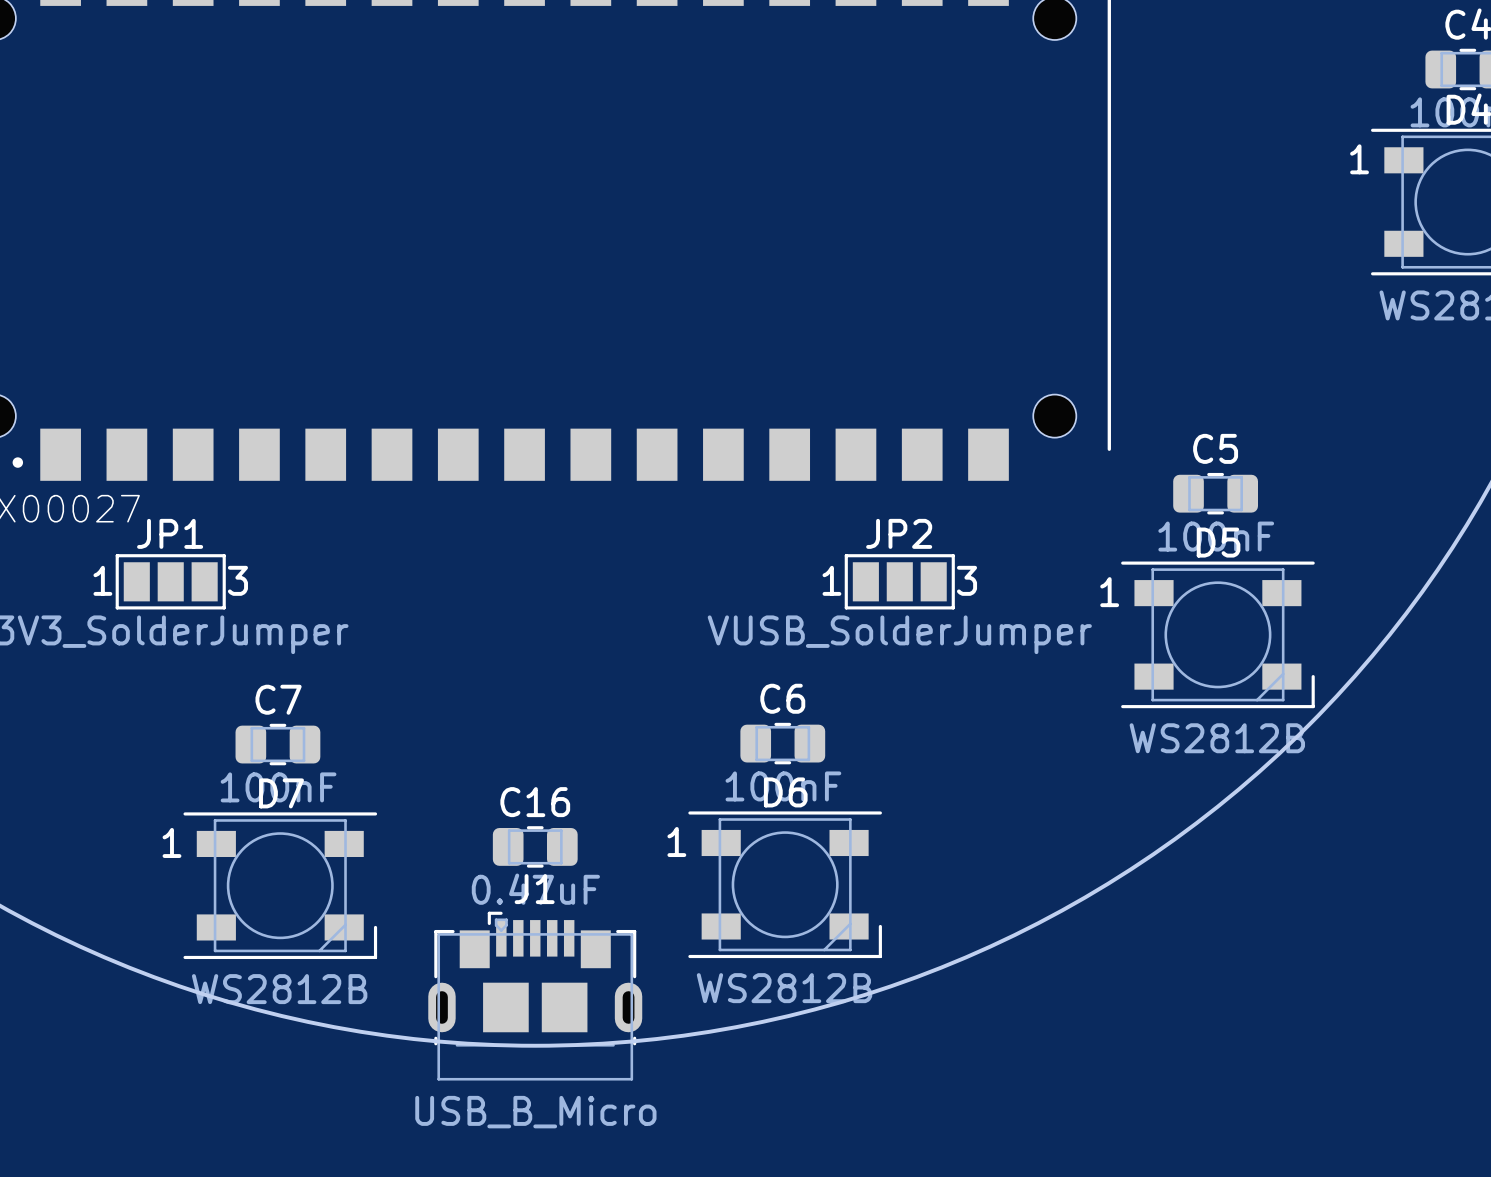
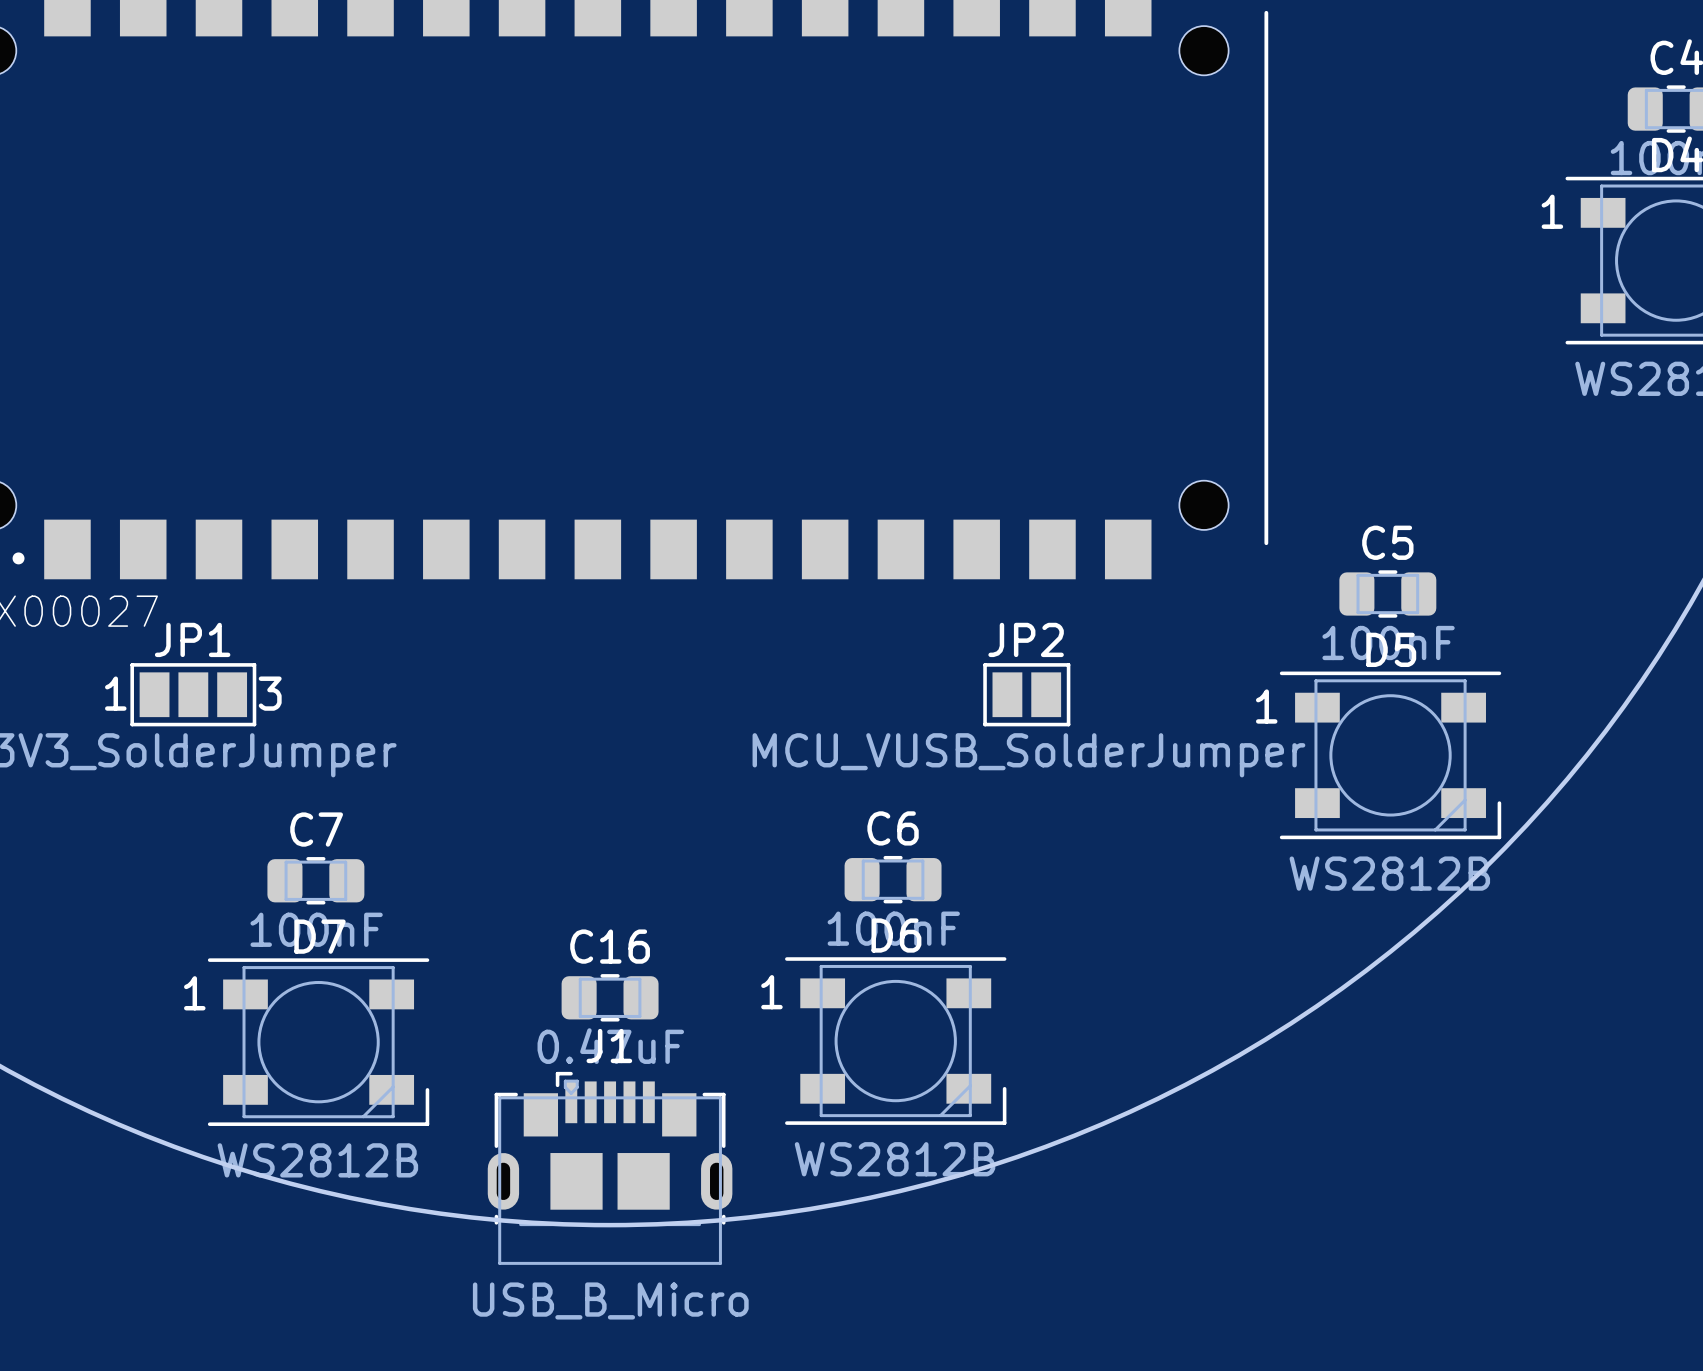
JP2 footprint: [844, 554, 955, 610] -> [983, 663, 1071, 727]
JP2 value: VUSB_SolderJumper (899, 634) -> MCU_VUSB_SolderJumper (1028, 755)

